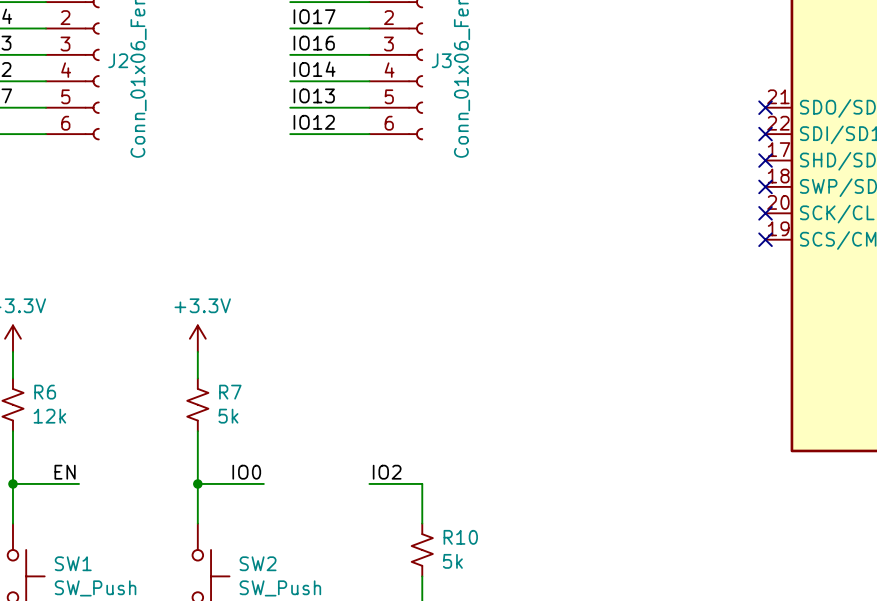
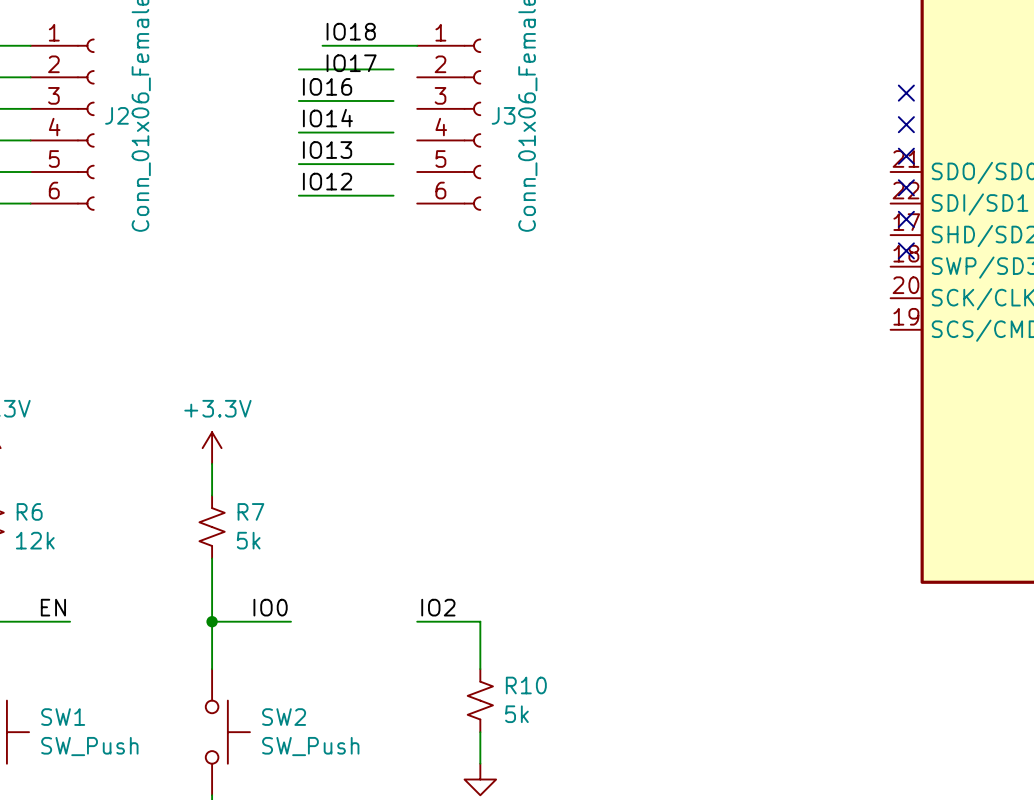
wire: (290, 28) (369, 28) -> (298, 69) (393, 69)
no-connect mark: none -> (906, 93)
label position: IO16 (314, 43) -> IO16 (327, 86)
wire: (290, 54) (369, 54) -> (298, 100) (393, 100)
no-connect mark: none -> (906, 124)
label position: IO14 (314, 69) -> IO14 (327, 118)
wire: (290, 81) (369, 81) -> (298, 132) (393, 132)
no-connect mark: none -> (906, 156)
label position: IO13 (314, 95) -> IO13 (327, 150)
wire: (290, 107) (369, 107) -> (298, 164) (393, 164)
no-connect mark: (765, 107) -> none
no-connect mark: none -> (906, 187)
label position: IO12 (314, 122) -> IO12 (327, 181)
wire: (290, 134) (369, 134) -> (298, 195) (393, 195)
no-connect mark: (765, 134) -> none
no-connect mark: none -> (906, 219)
no-connect mark: (765, 160) -> none
no-connect mark: none -> (906, 250)
no-connect mark: (765, 186) -> none
no-connect mark: (765, 213) -> none
no-connect mark: (765, 239) -> none

